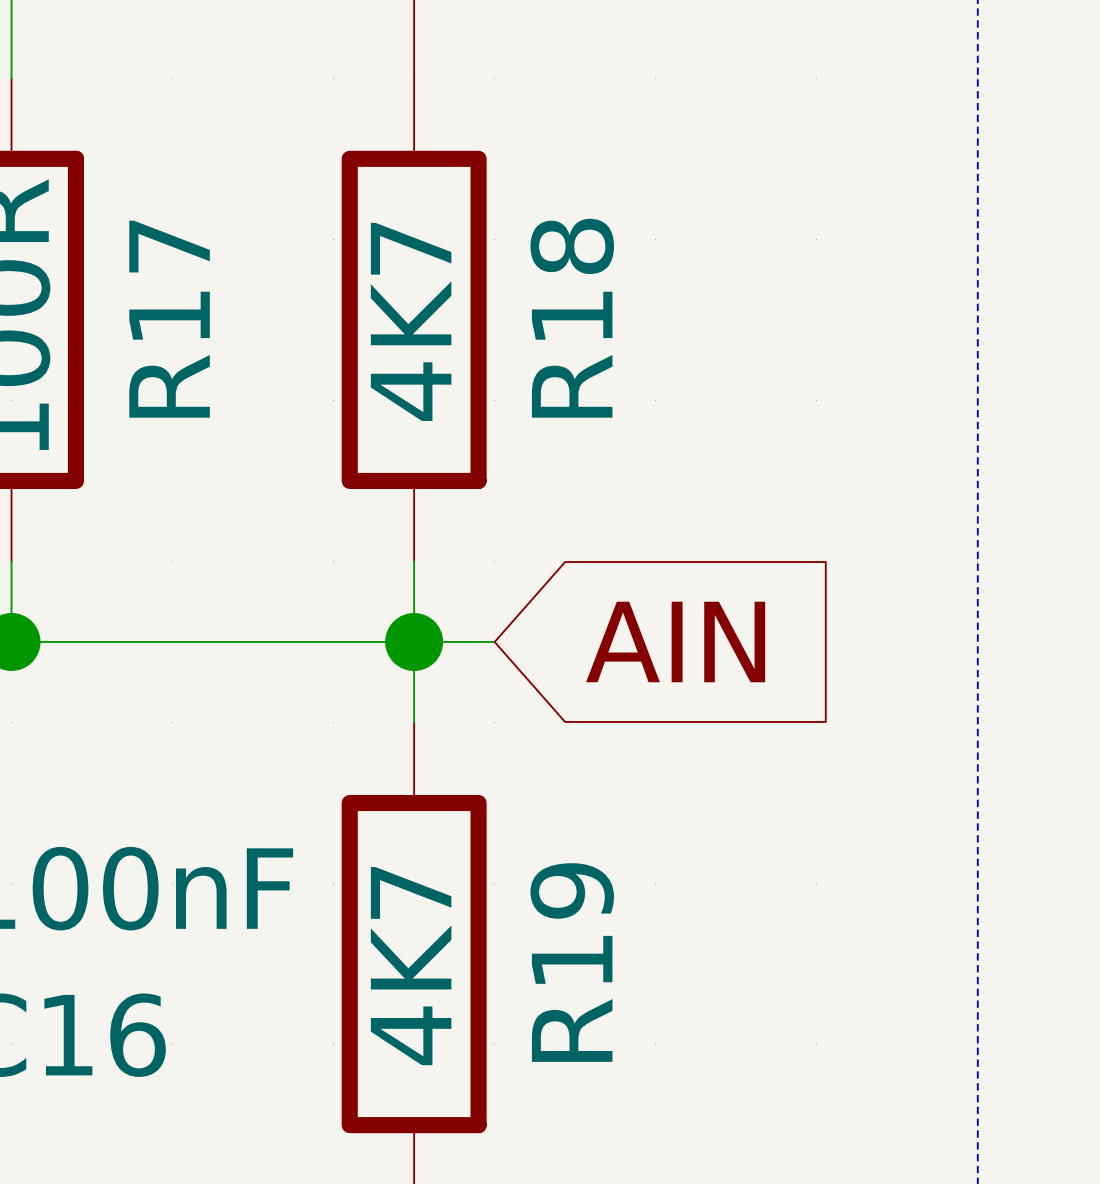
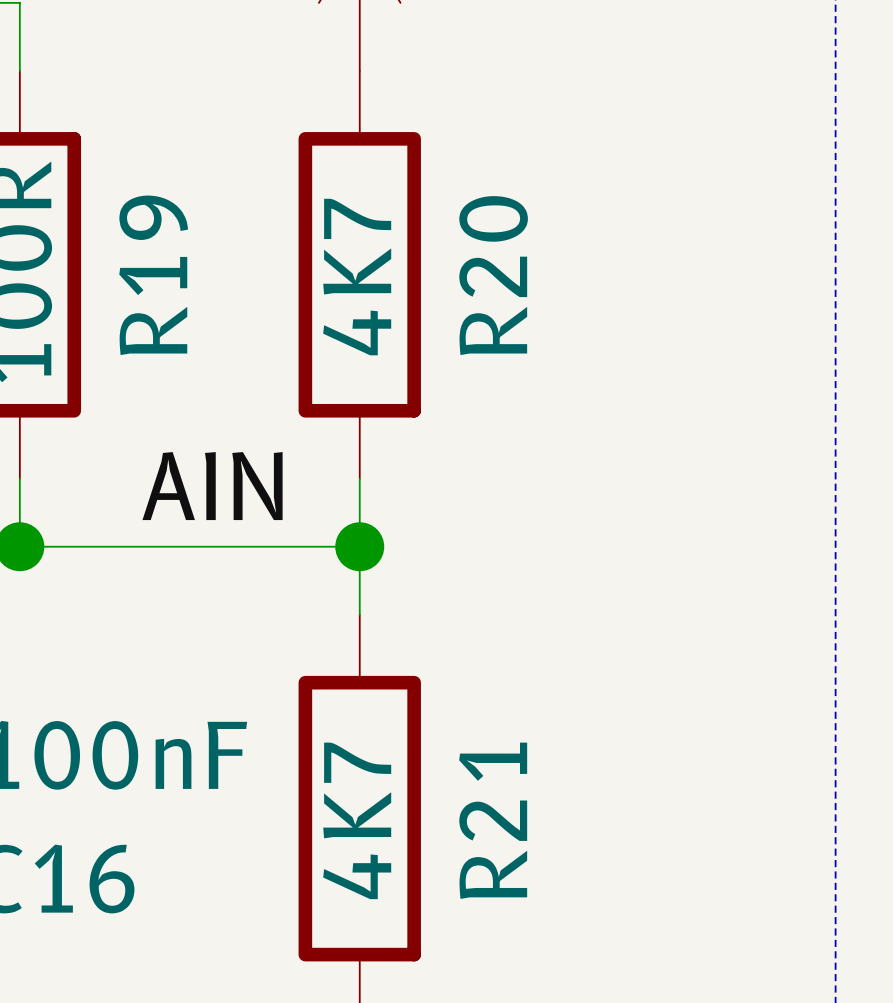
R18 name: R18 (572, 318) -> R20 (493, 275)
R17 name: R17 (169, 319) -> R19 (153, 275)
label: none -> AIN (212, 486)
wire: (414, 641) (494, 641) -> none
global label: AIN (675, 641) -> none
R19 name: R19 (572, 962) -> R21 (493, 820)

